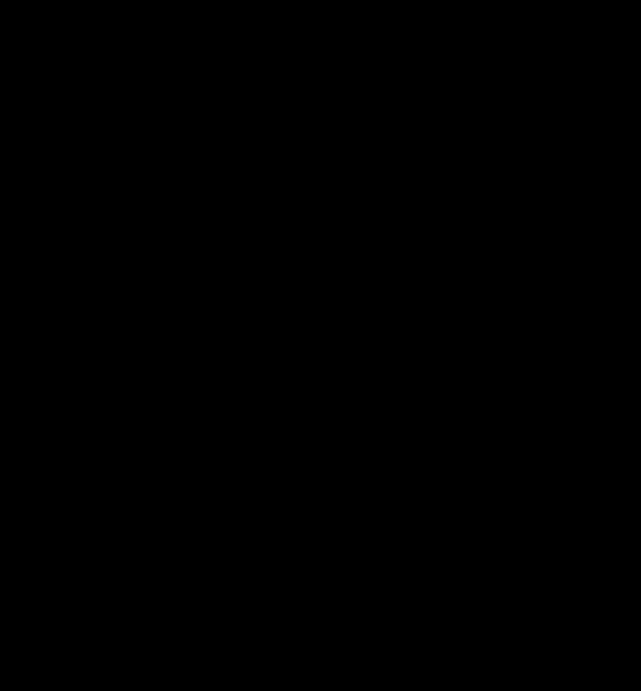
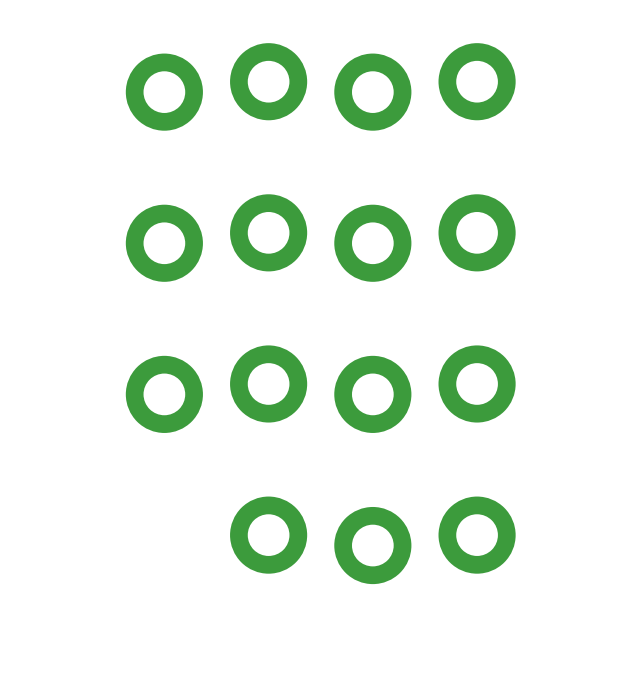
part: none -> (320, 86)
part: none -> (320, 238)
part: none -> (320, 389)
part: none -> (372, 540)

